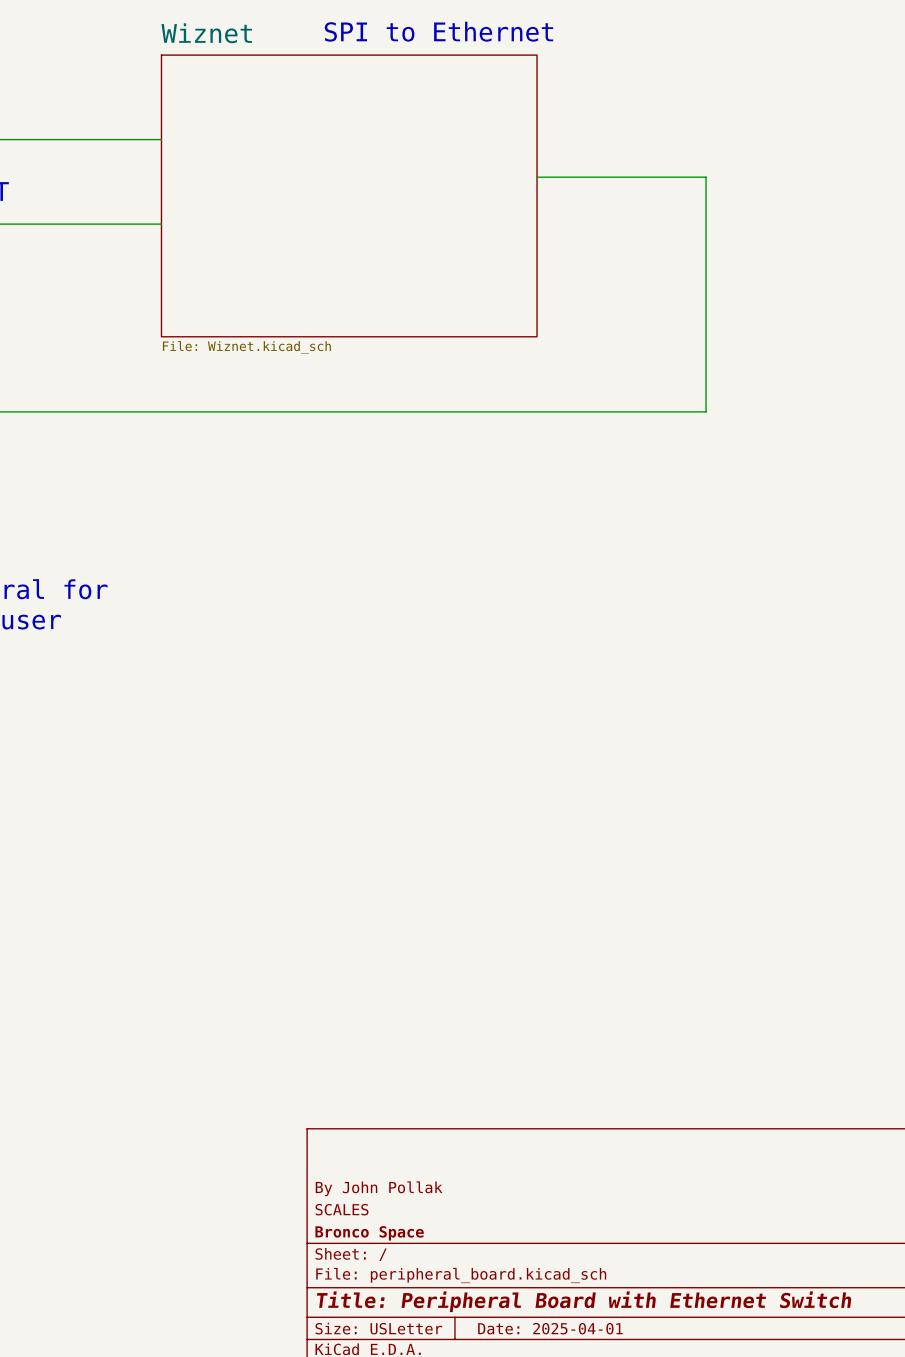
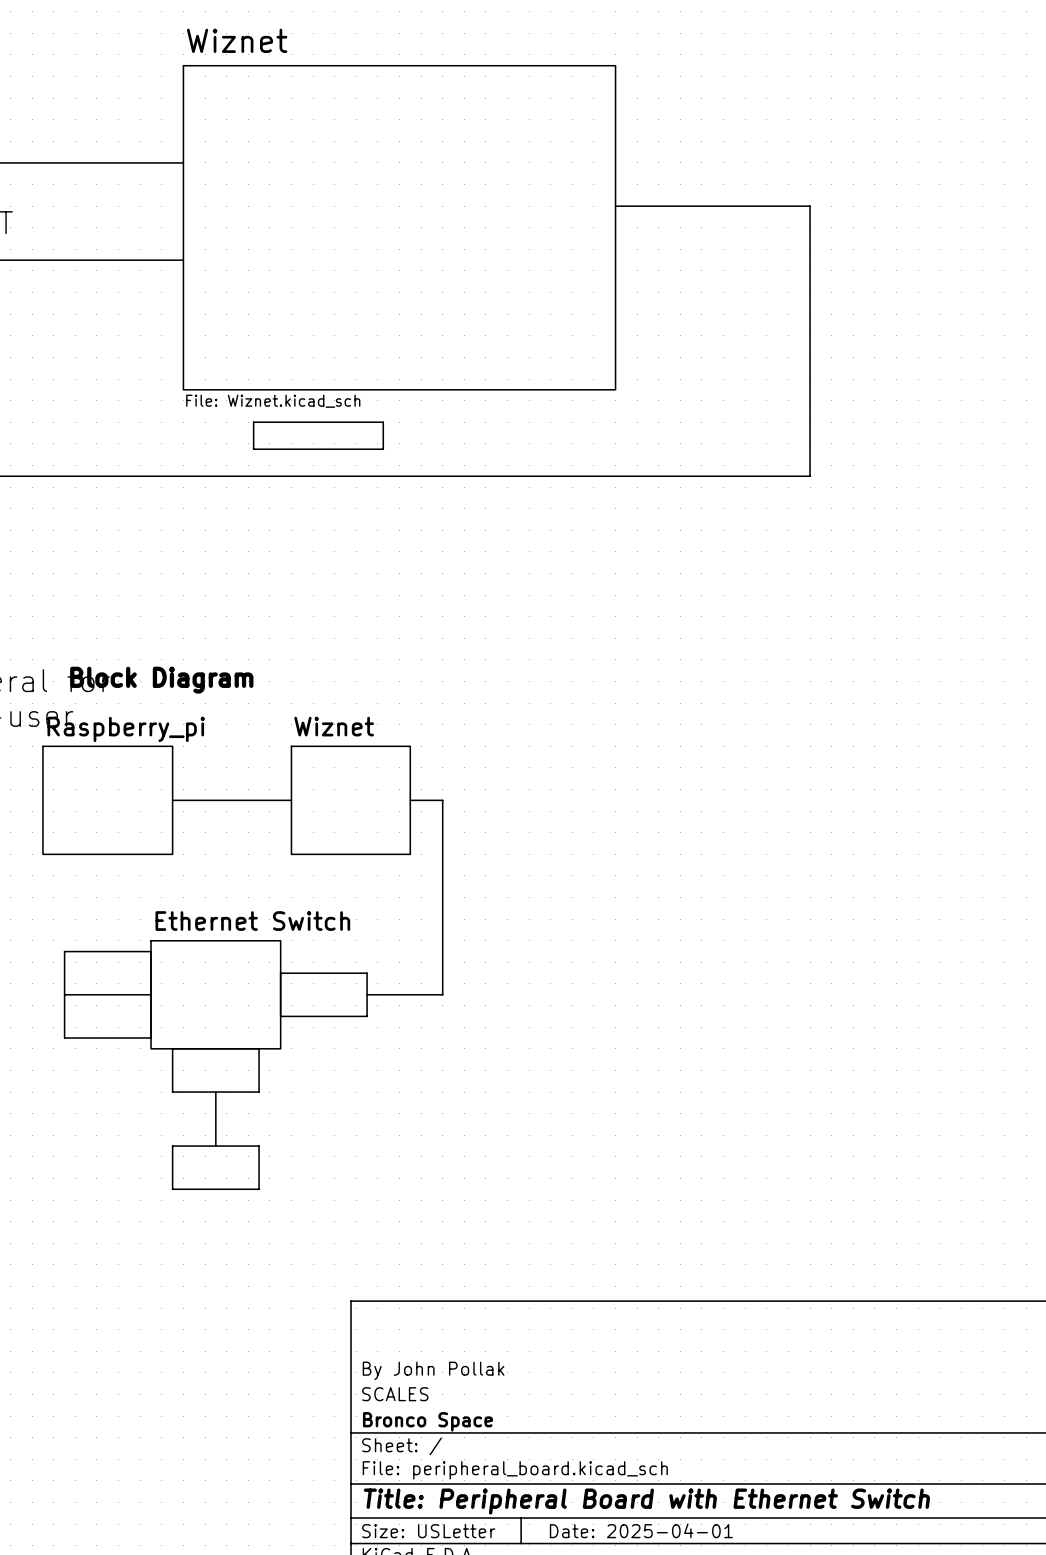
text: SPI to Ethernet (438, 31) -> none
line: none -> (253, 422) (383, 422) (383, 449) (253, 449) (253, 422)
text: none -> Block Diagram (161, 680)
sheet Raspberry_pi: none -> (107, 800)
wire: none -> (172, 800) (291, 800)
sheet Wiznet: none -> (350, 800)
wire: none -> (410, 800) (442, 800) (442, 994) (367, 994)
line: none -> (64, 951) (64, 1038) (151, 1038) (151, 951) (64, 951)
line: none -> (280, 973) (367, 973) (367, 1016) (280, 1016) (280, 973)
line: none -> (64, 994) (151, 994)
sheet Ethernet Switch: none -> (215, 994)
line: none -> (172, 1048) (259, 1048) (259, 1092) (172, 1092) (172, 1048)
wire: none -> (215, 1092) (215, 1146)
line: none -> (172, 1146) (172, 1189) (259, 1189) (259, 1146) (172, 1146)

